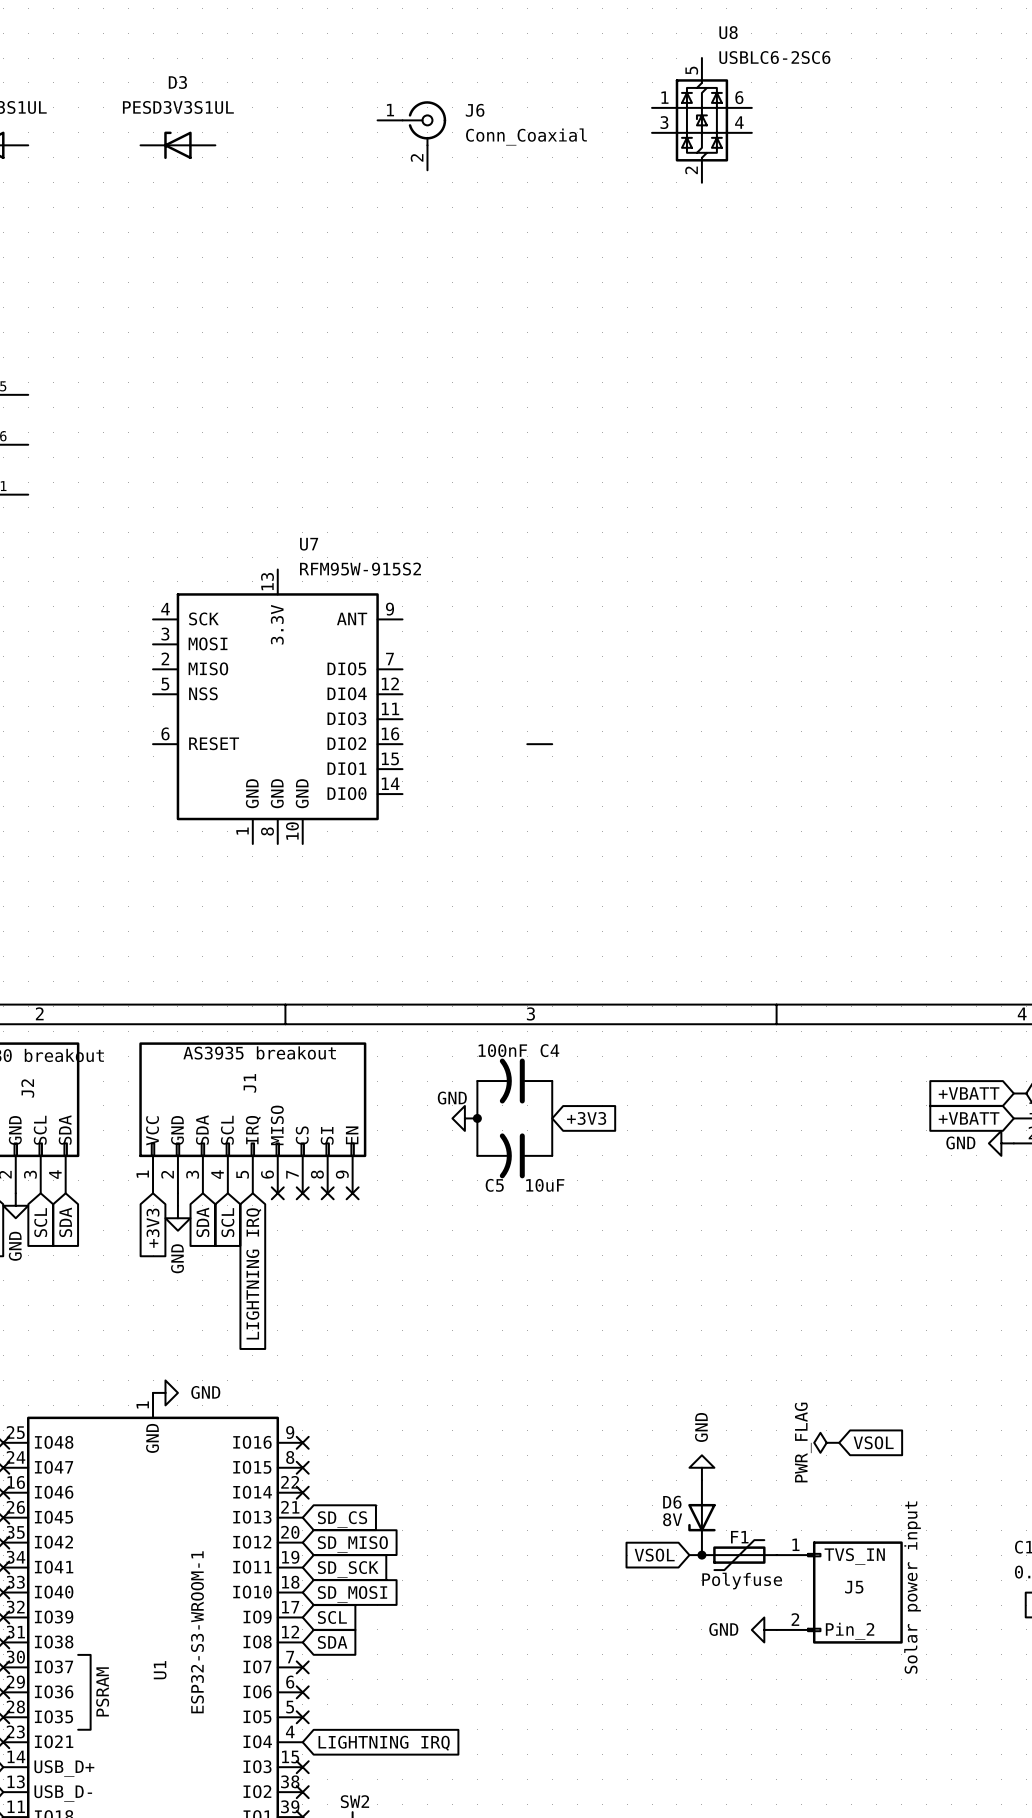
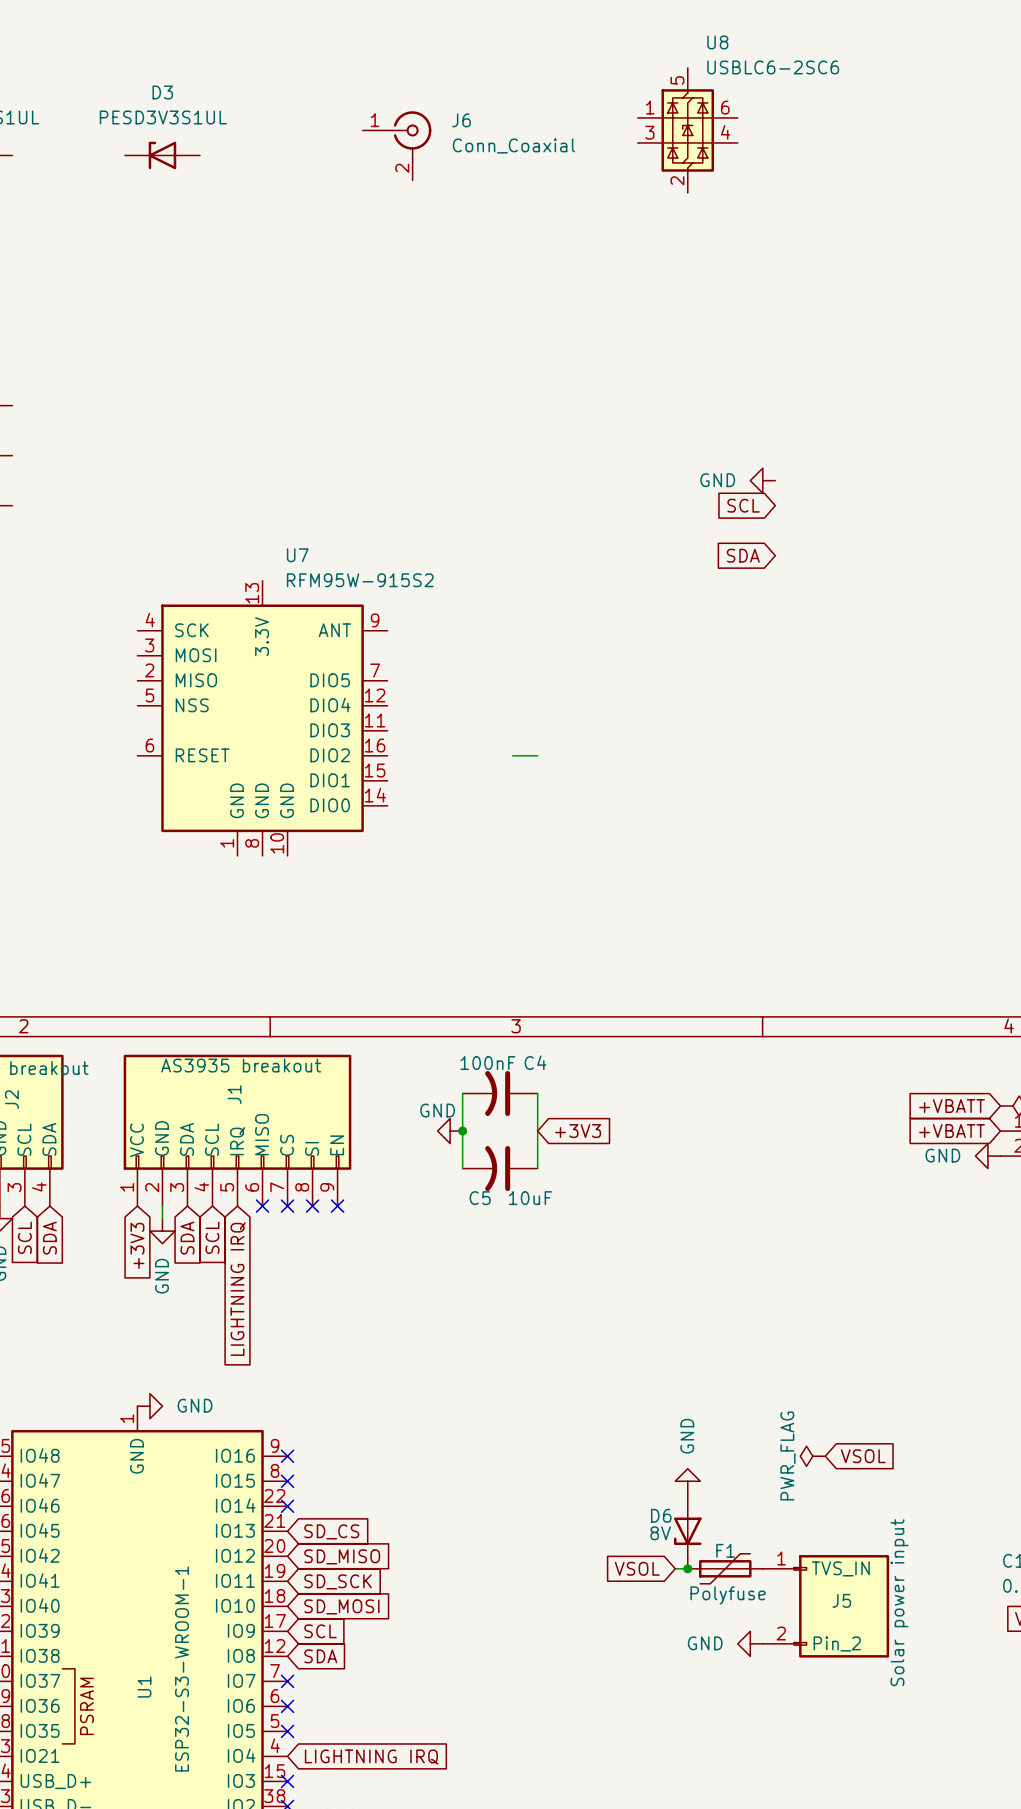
power symbol: none -> GND (762, 480)
global label: none -> SCL (743, 505)
global label: none -> SDA (743, 555)

